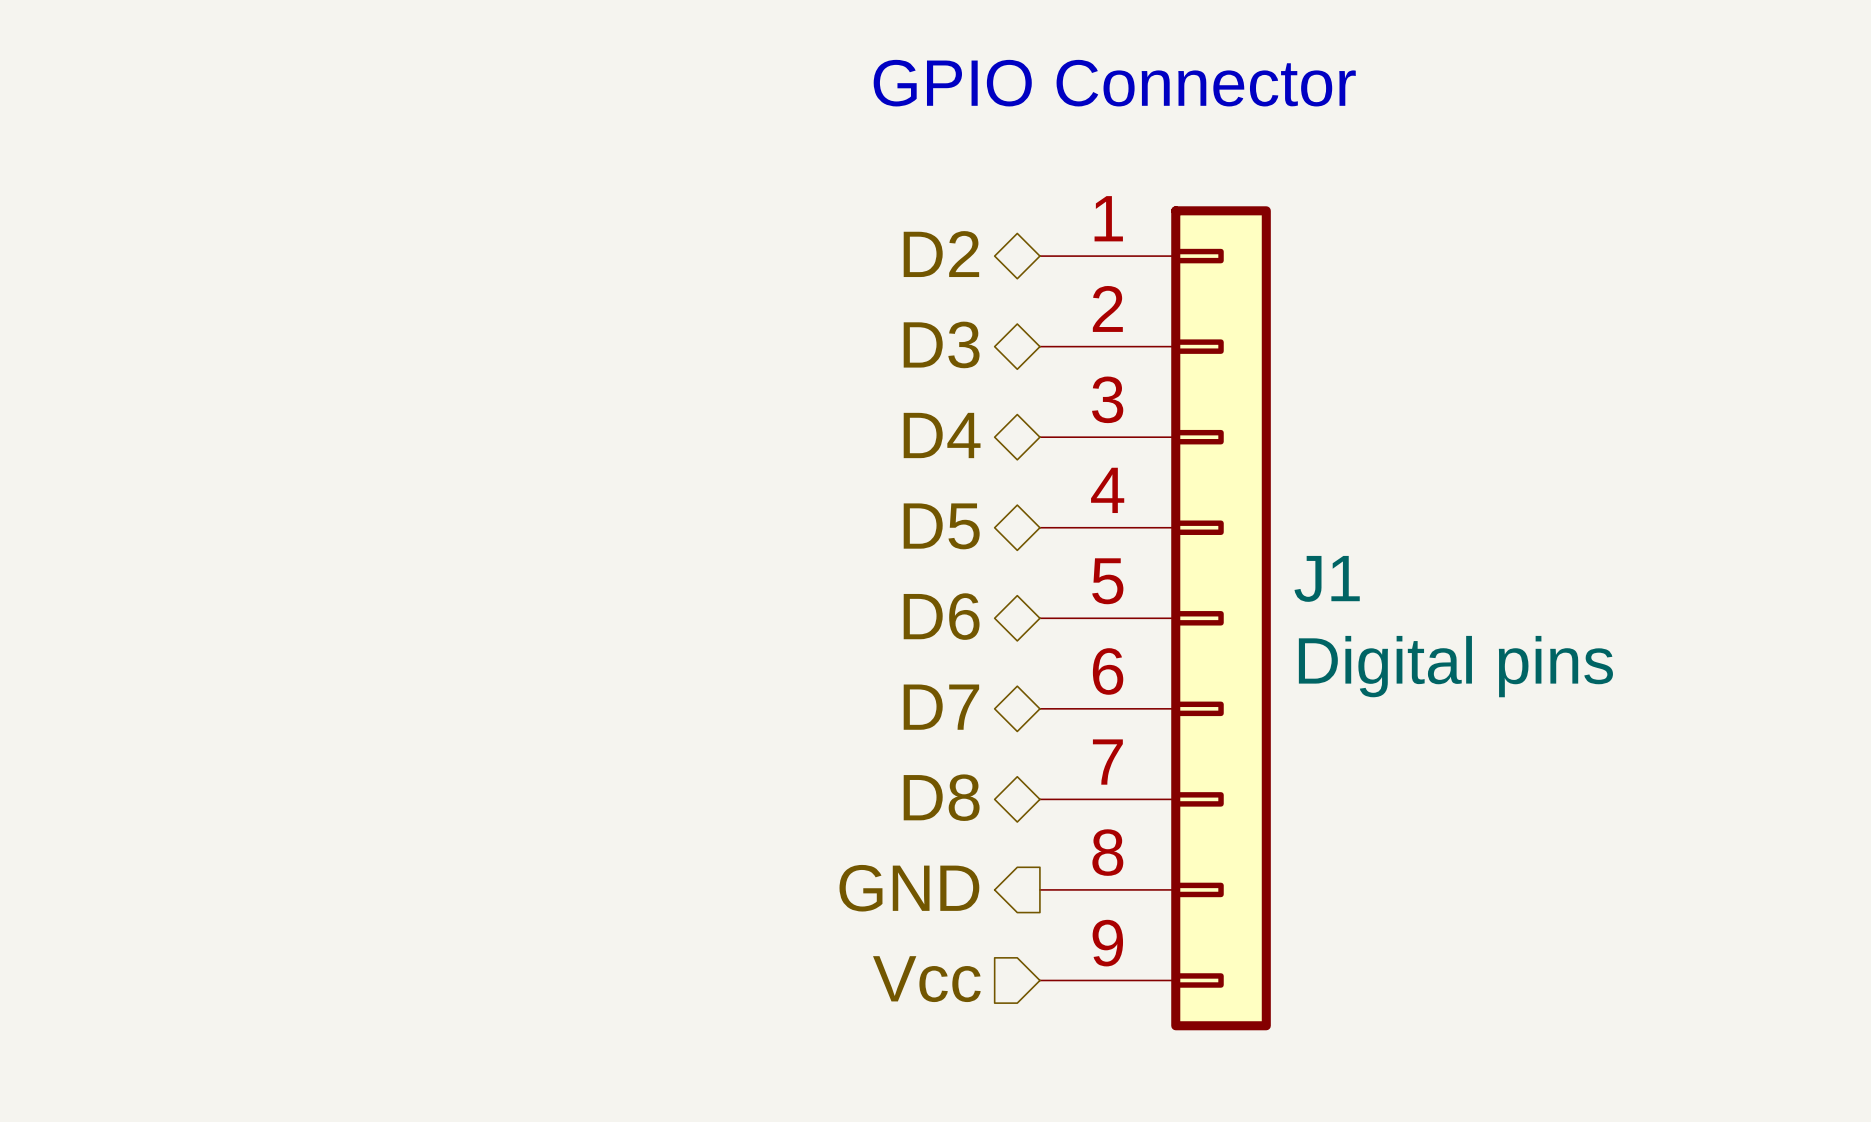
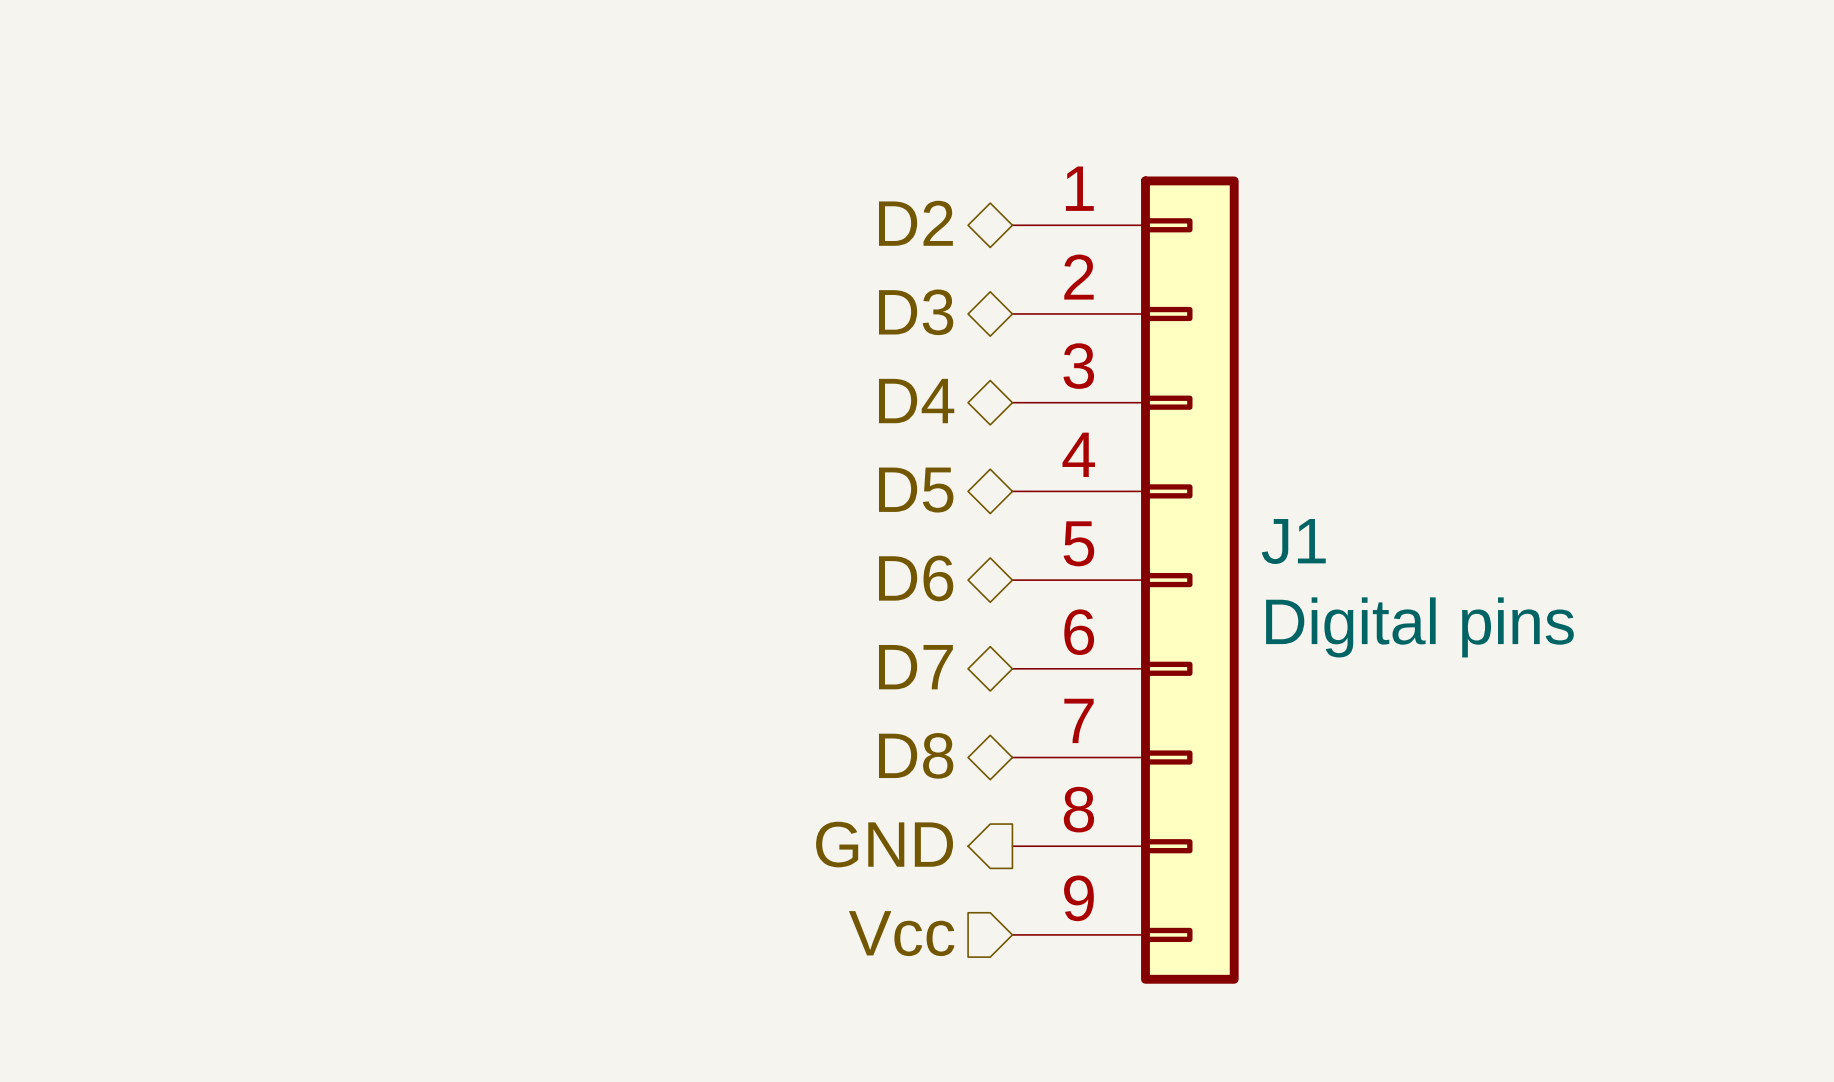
text: GPIO Connector (1114, 83) -> none

